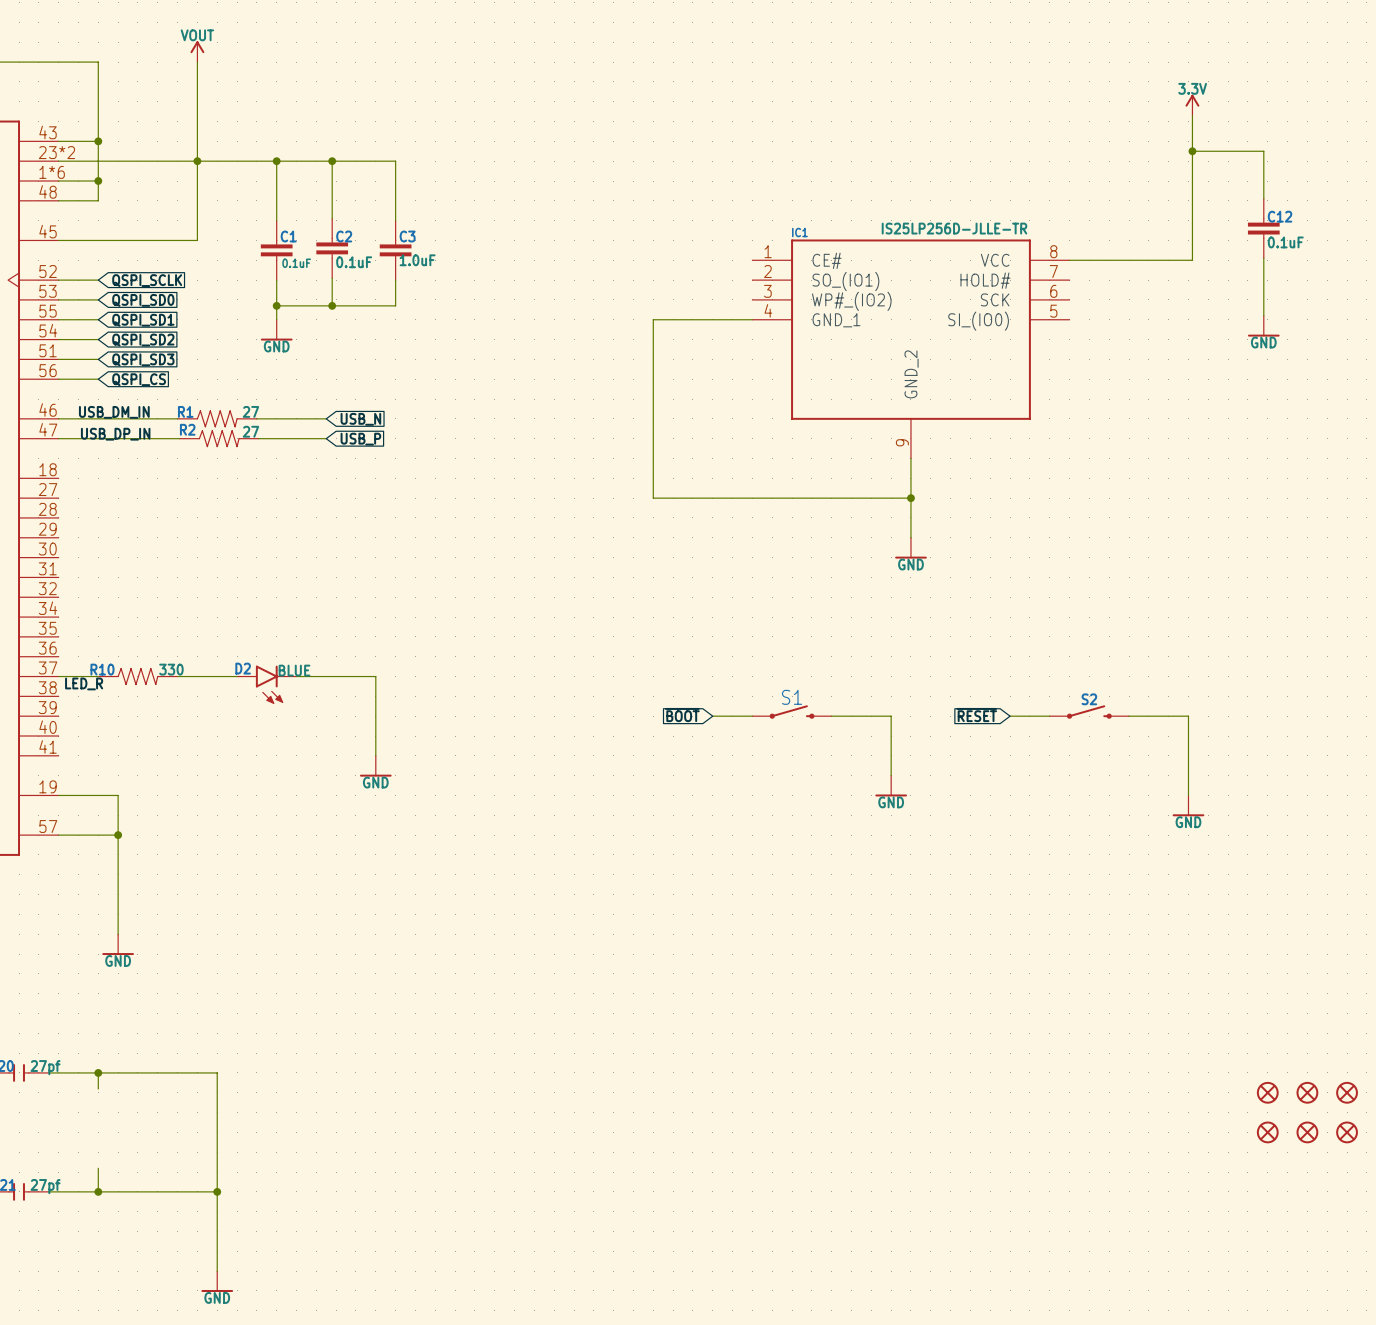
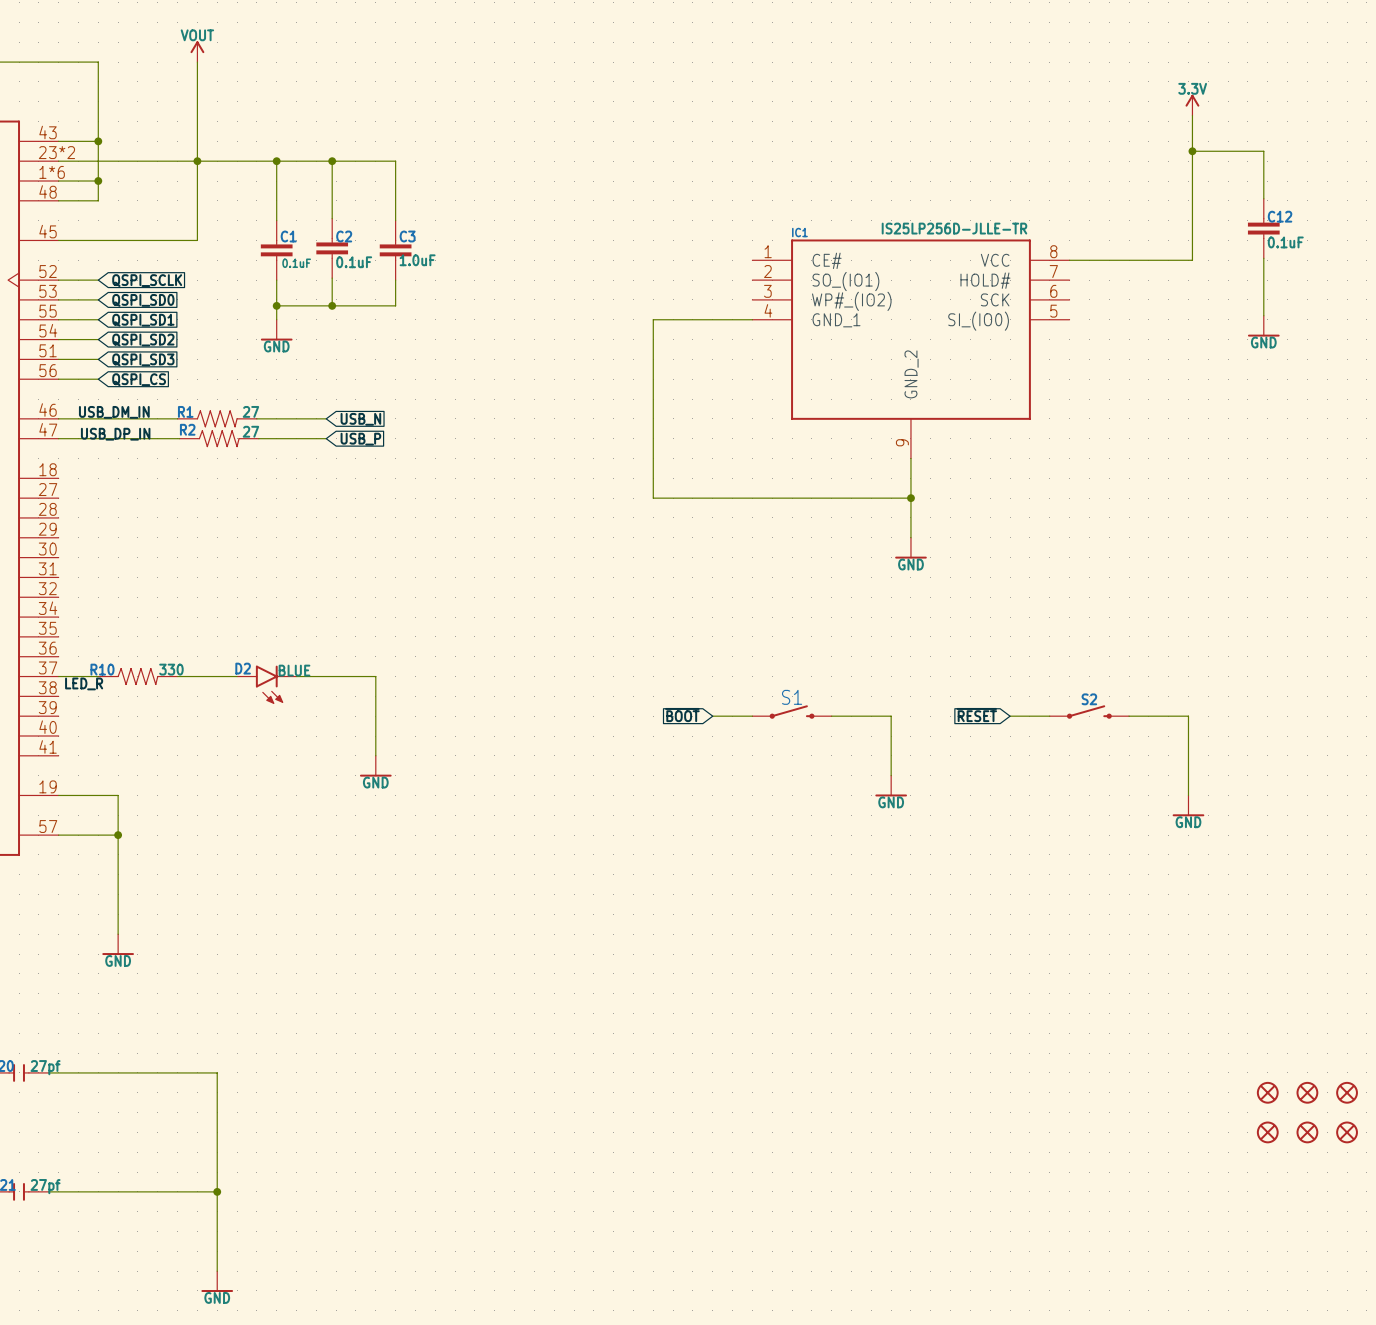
wire: (98, 1072) (98, 1089) -> none
junction: (98, 1072) -> none
wire: (98, 1168) (98, 1191) -> none
junction: (98, 1191) -> none

